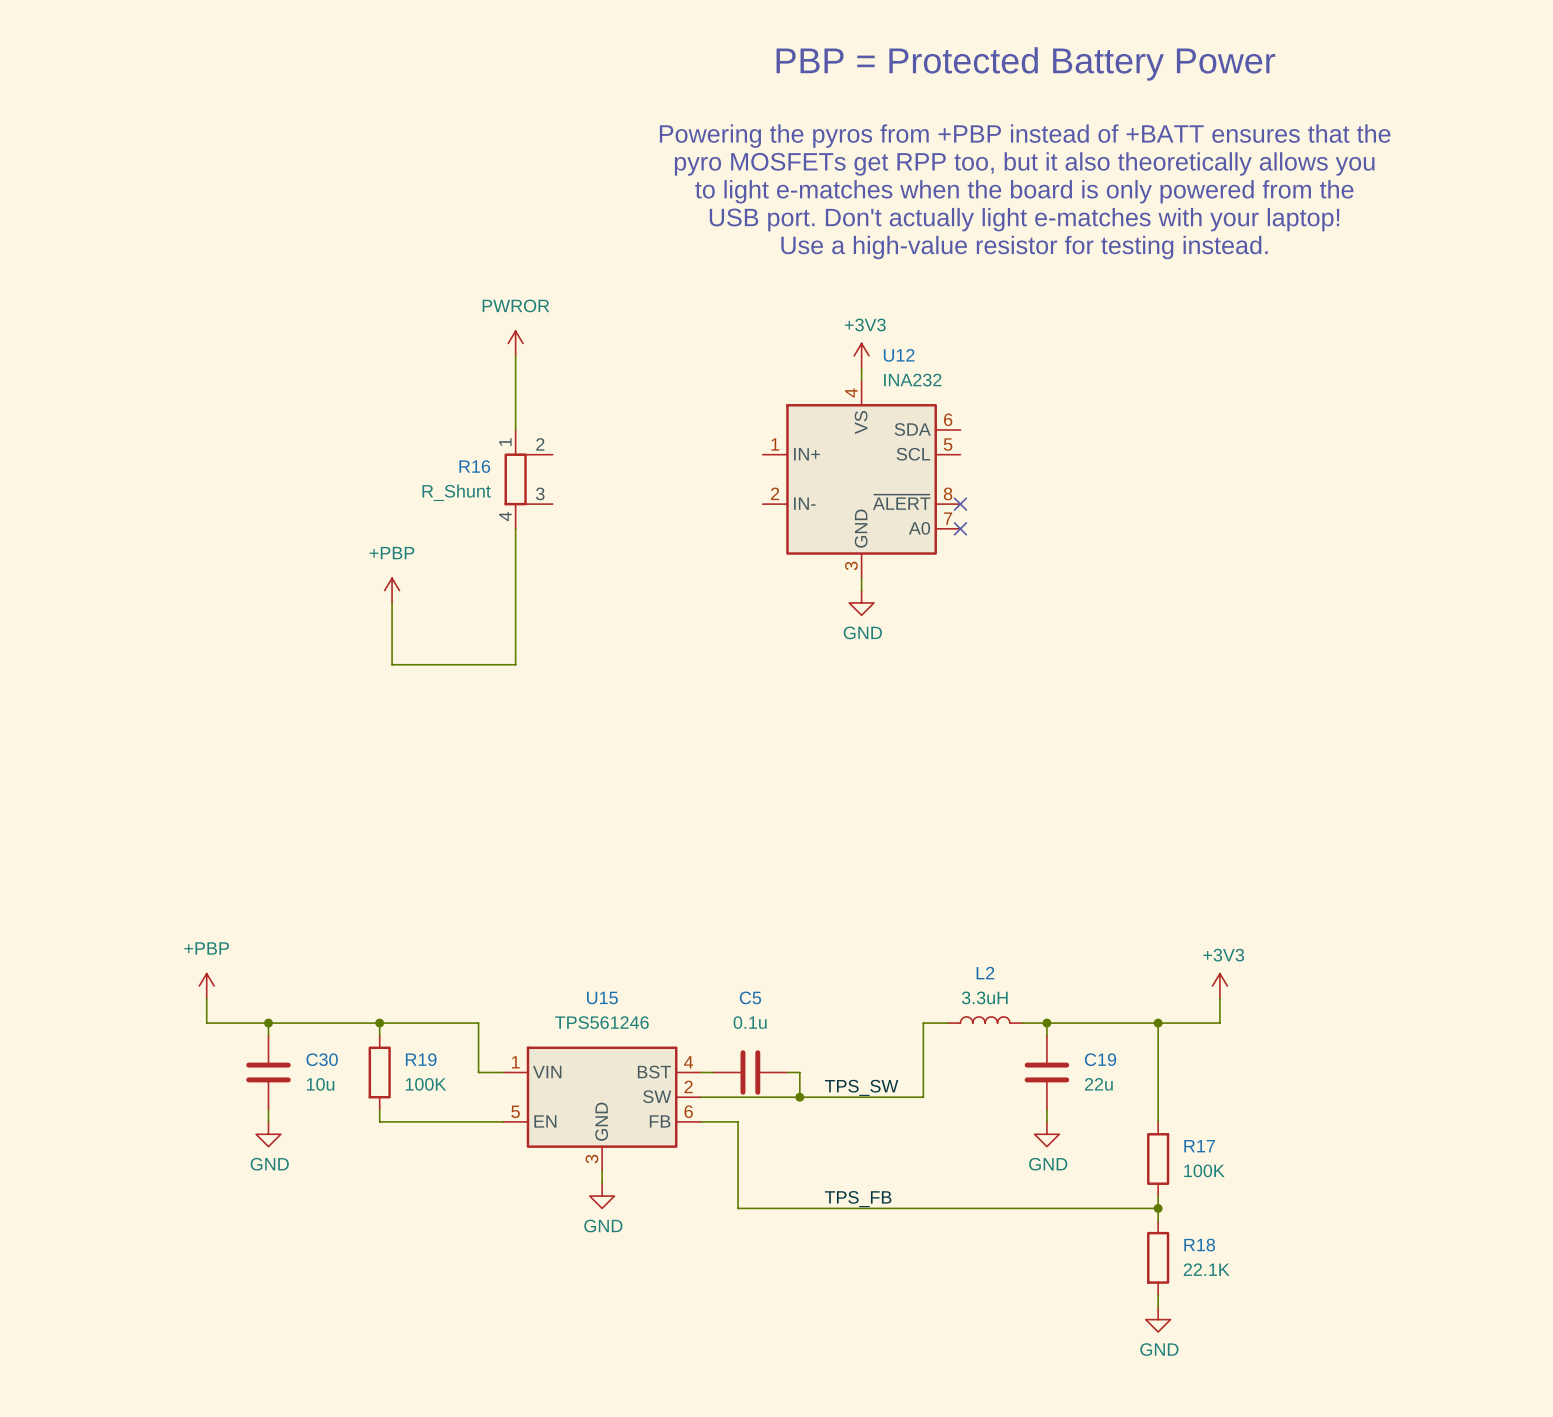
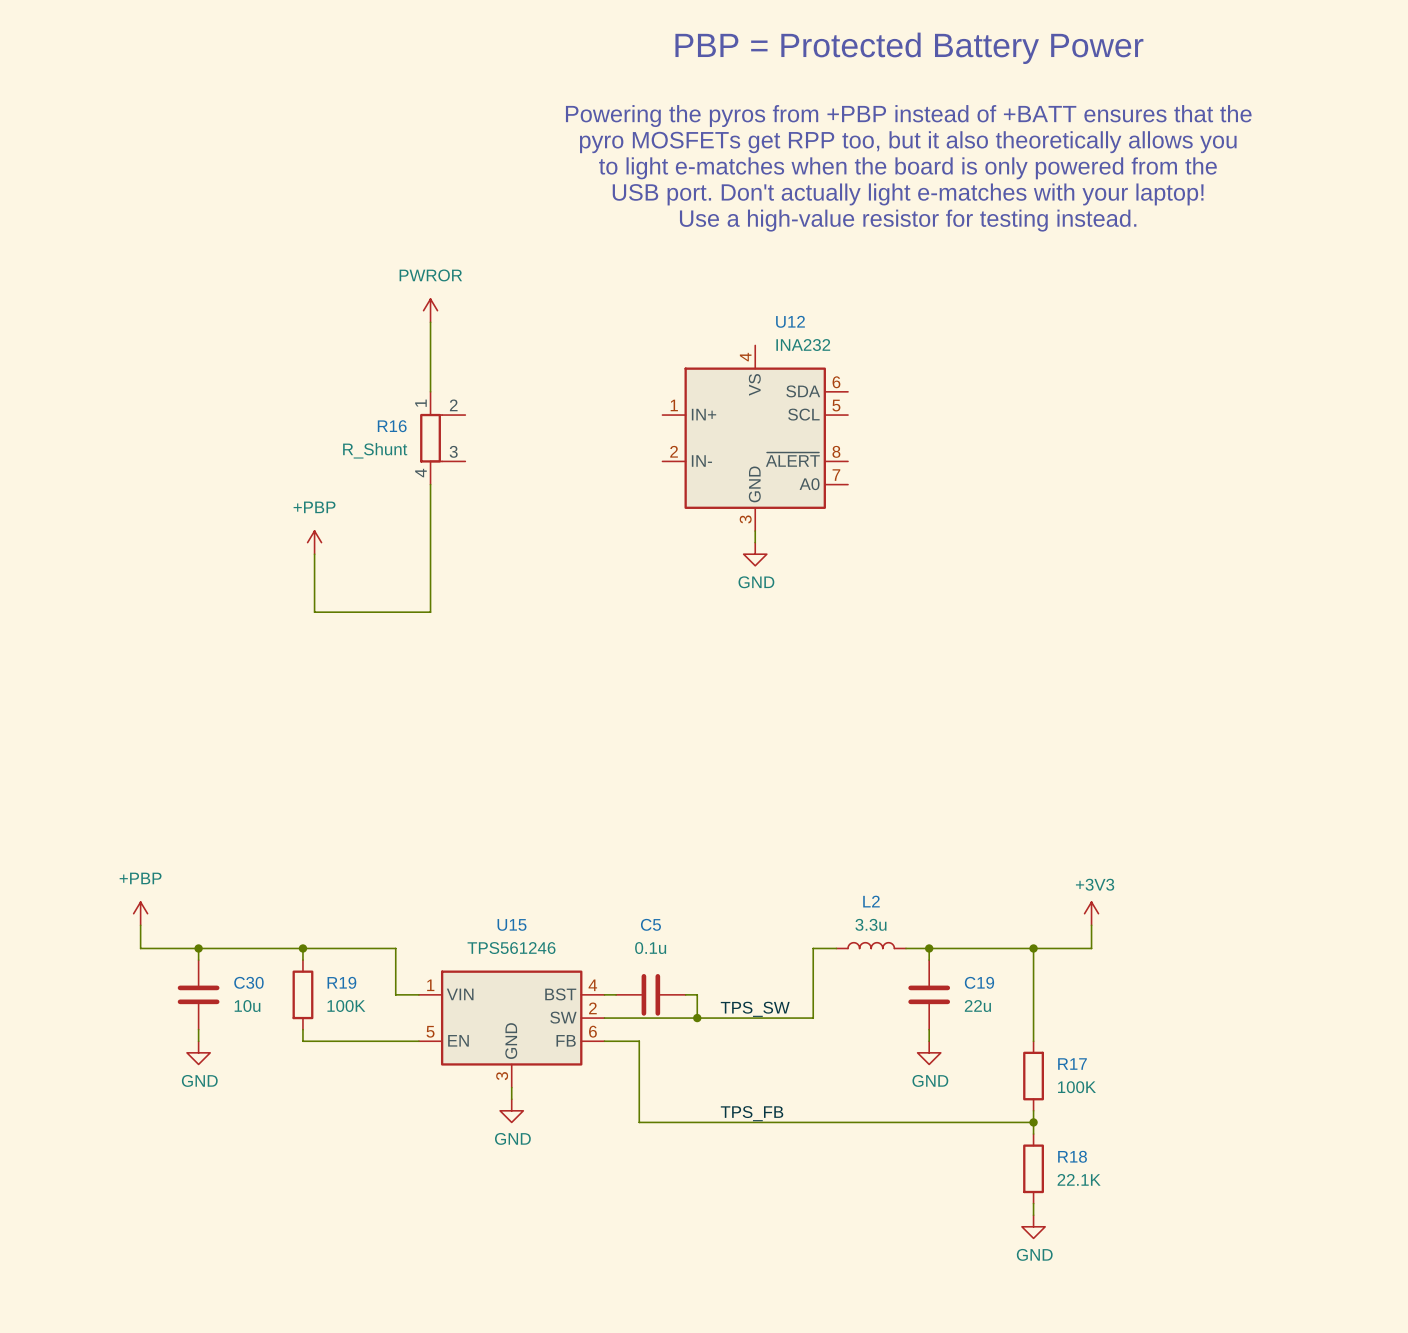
power symbol: +3V3 (861, 355) -> none
wire: (861, 368) (861, 380) -> none
no-connect mark: (960, 504) -> none
no-connect mark: (960, 528) -> none
L2 value: 3.3uH (984, 997) -> 3.3u (870, 924)

